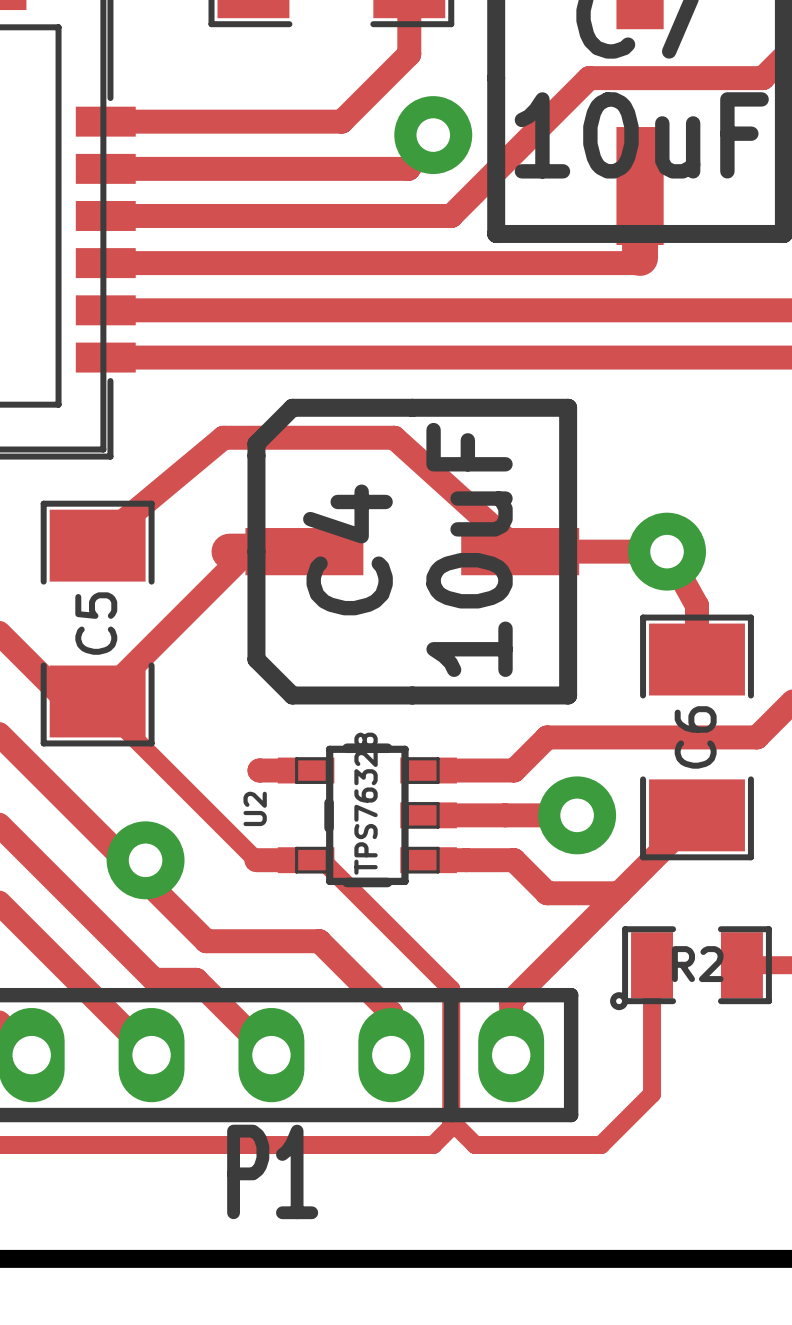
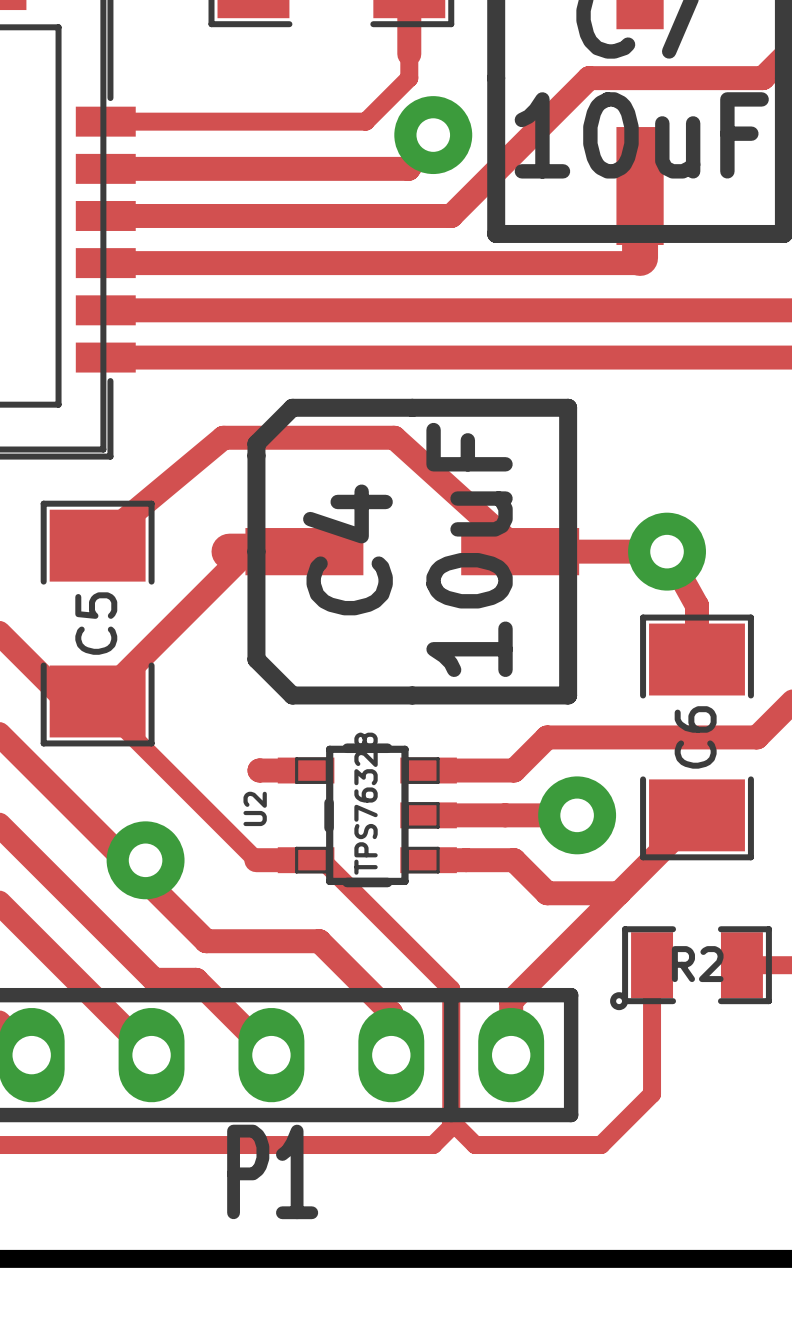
track: (409, 54) (341, 121) (409, 54) -> (341, 121) (365, 121) (409, 78) (409, 54)
track width: thick (105, 121) (341, 121) -> thin (105, 121) (341, 121)

